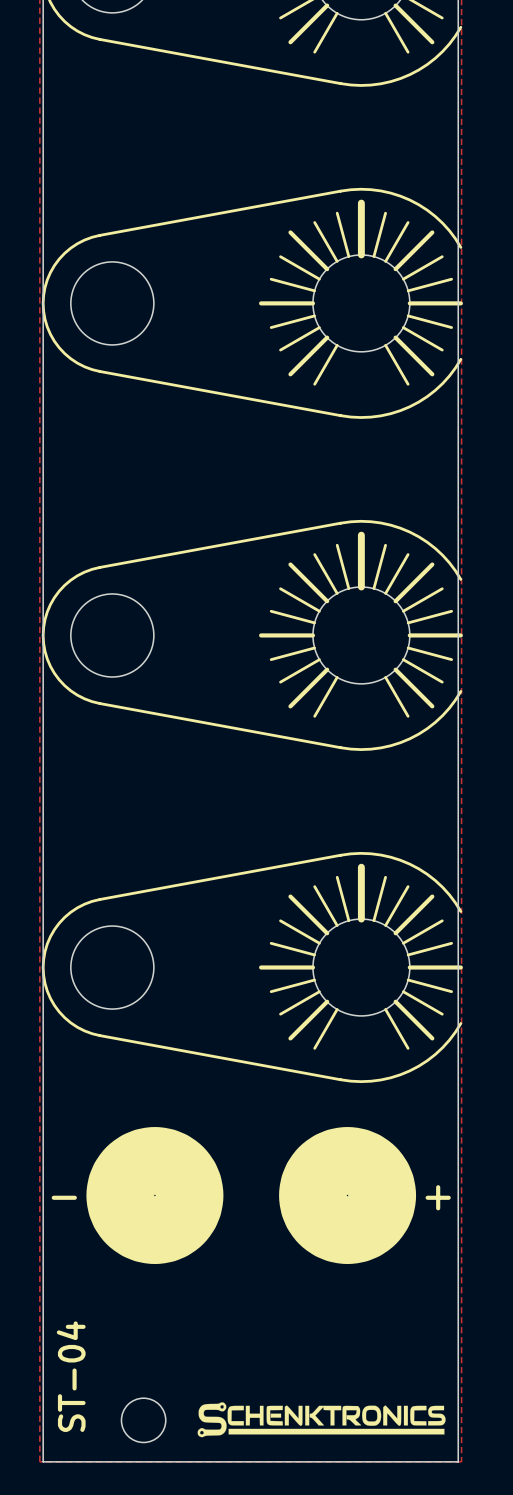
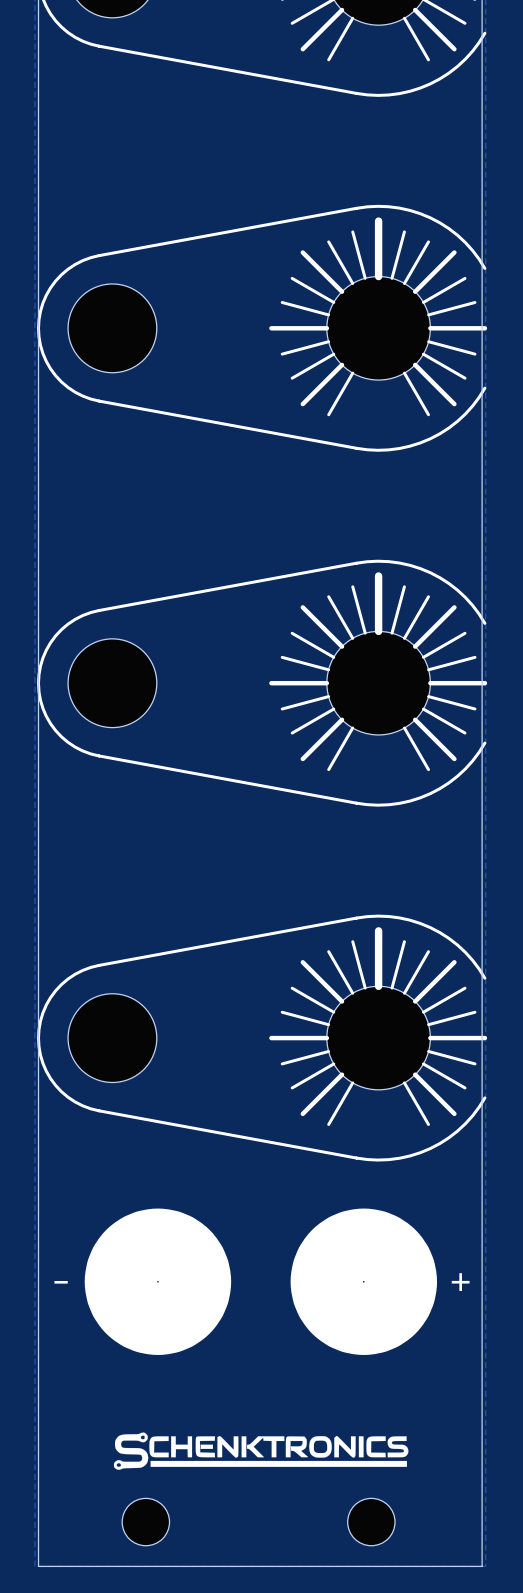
drawing: none -> [113, 1432, 409, 1470]
text: ST-04 (71, 1376) -> none
drawing: [197, 1402, 446, 1438] -> none
part: none -> (371, 1522)

